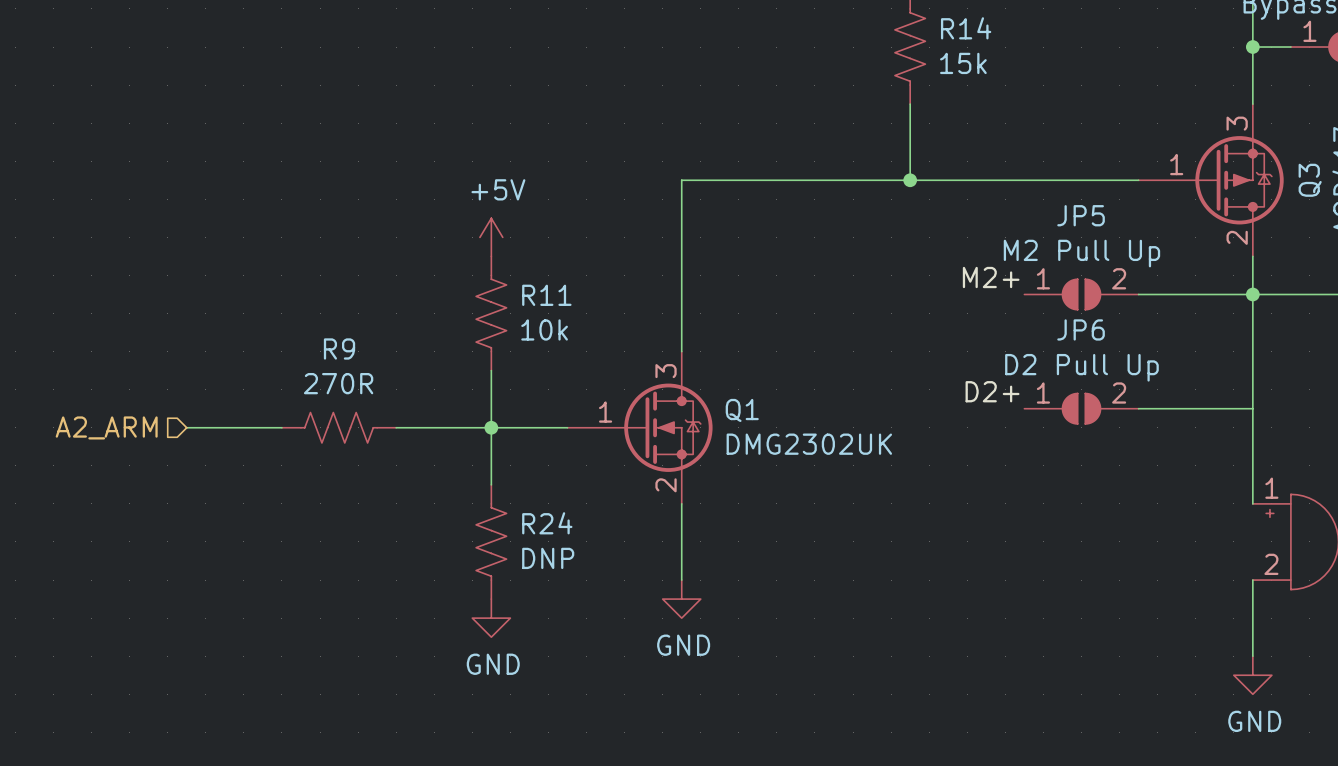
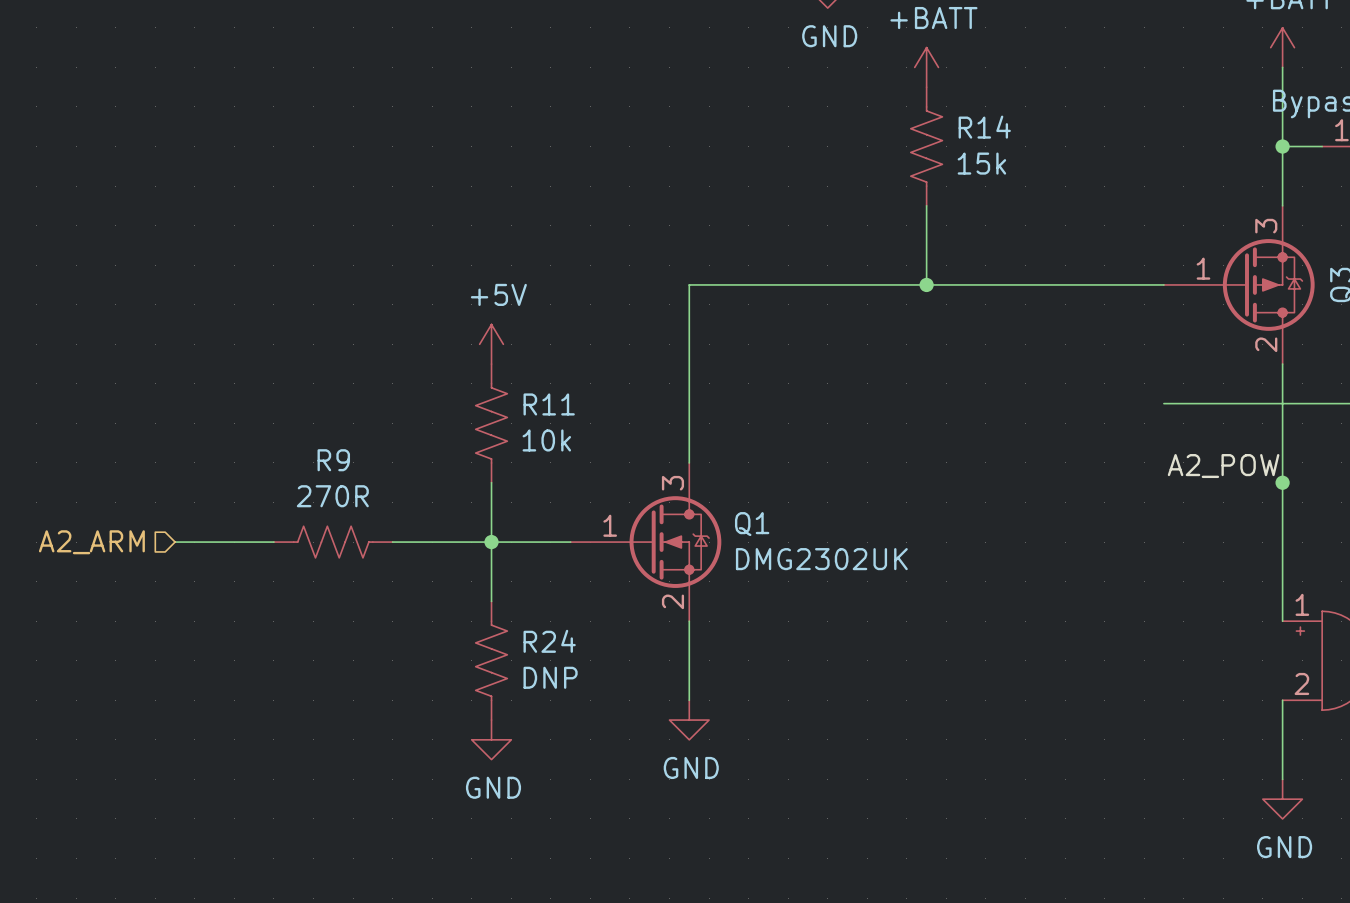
label: M2+ (991, 277) -> none
JP5: M2 Pull Up (1081, 294) -> none
junction position: (1252, 294) -> (1282, 482)
label: none -> A2_POW (1223, 466)
label: D2+ (992, 391) -> none
JP6: D2 Pull Up (1081, 408) -> none
wire: (1138, 408) (1252, 408) -> none

